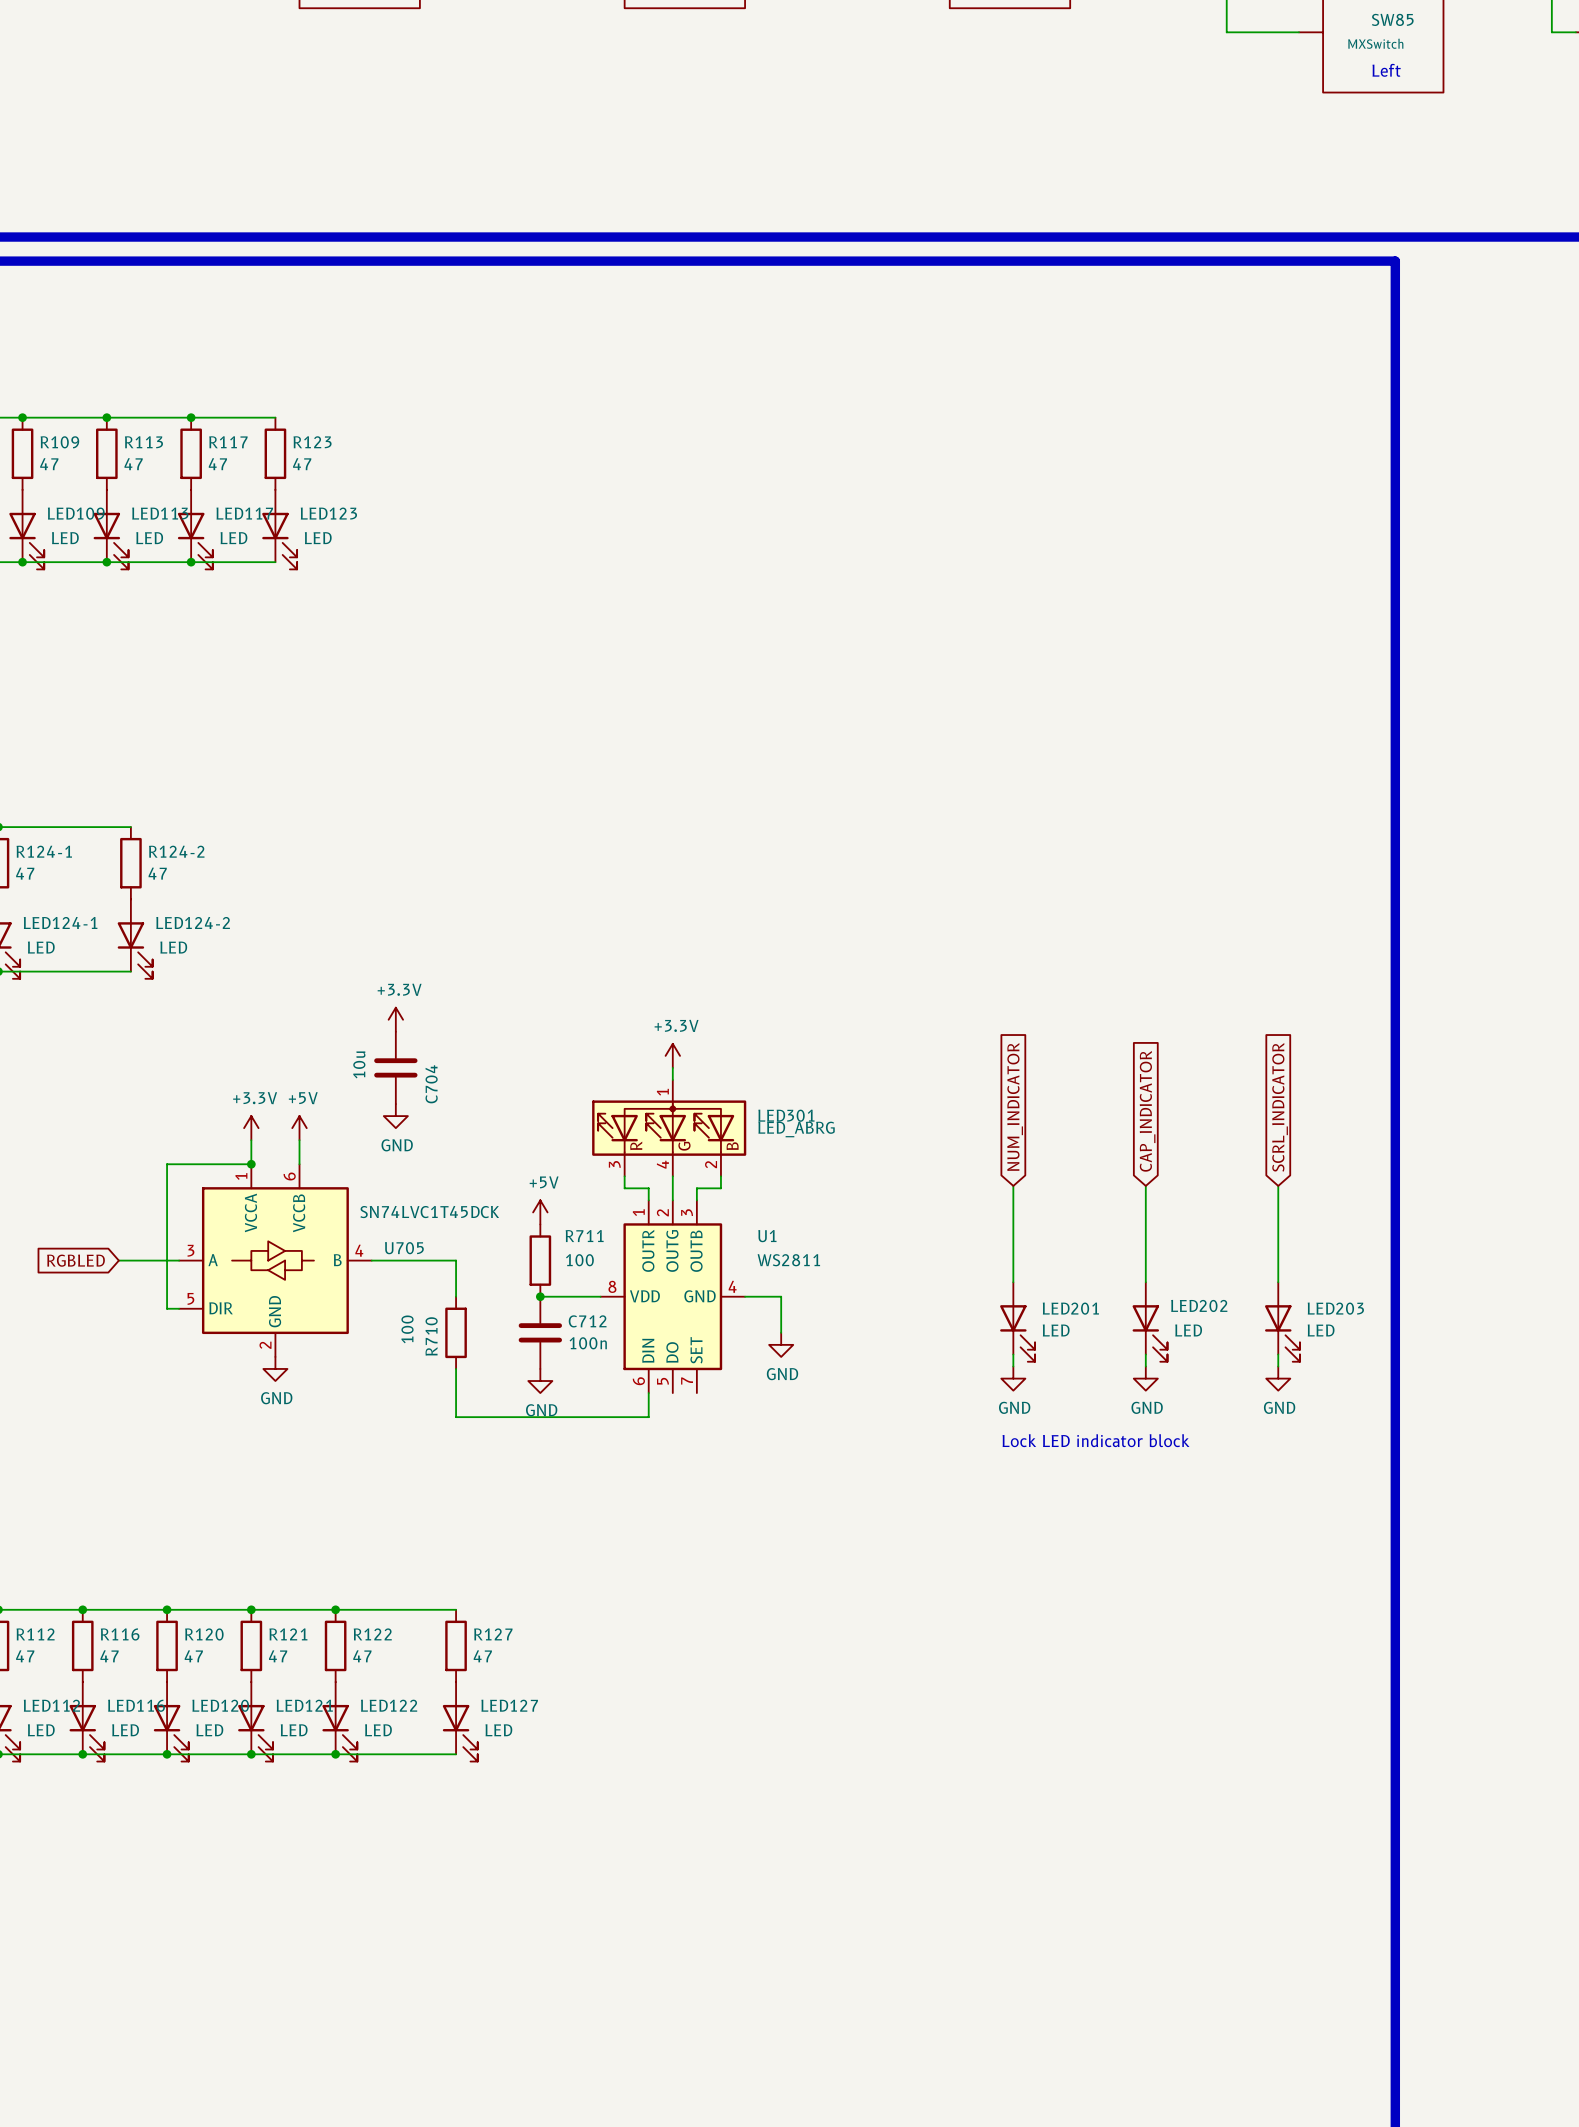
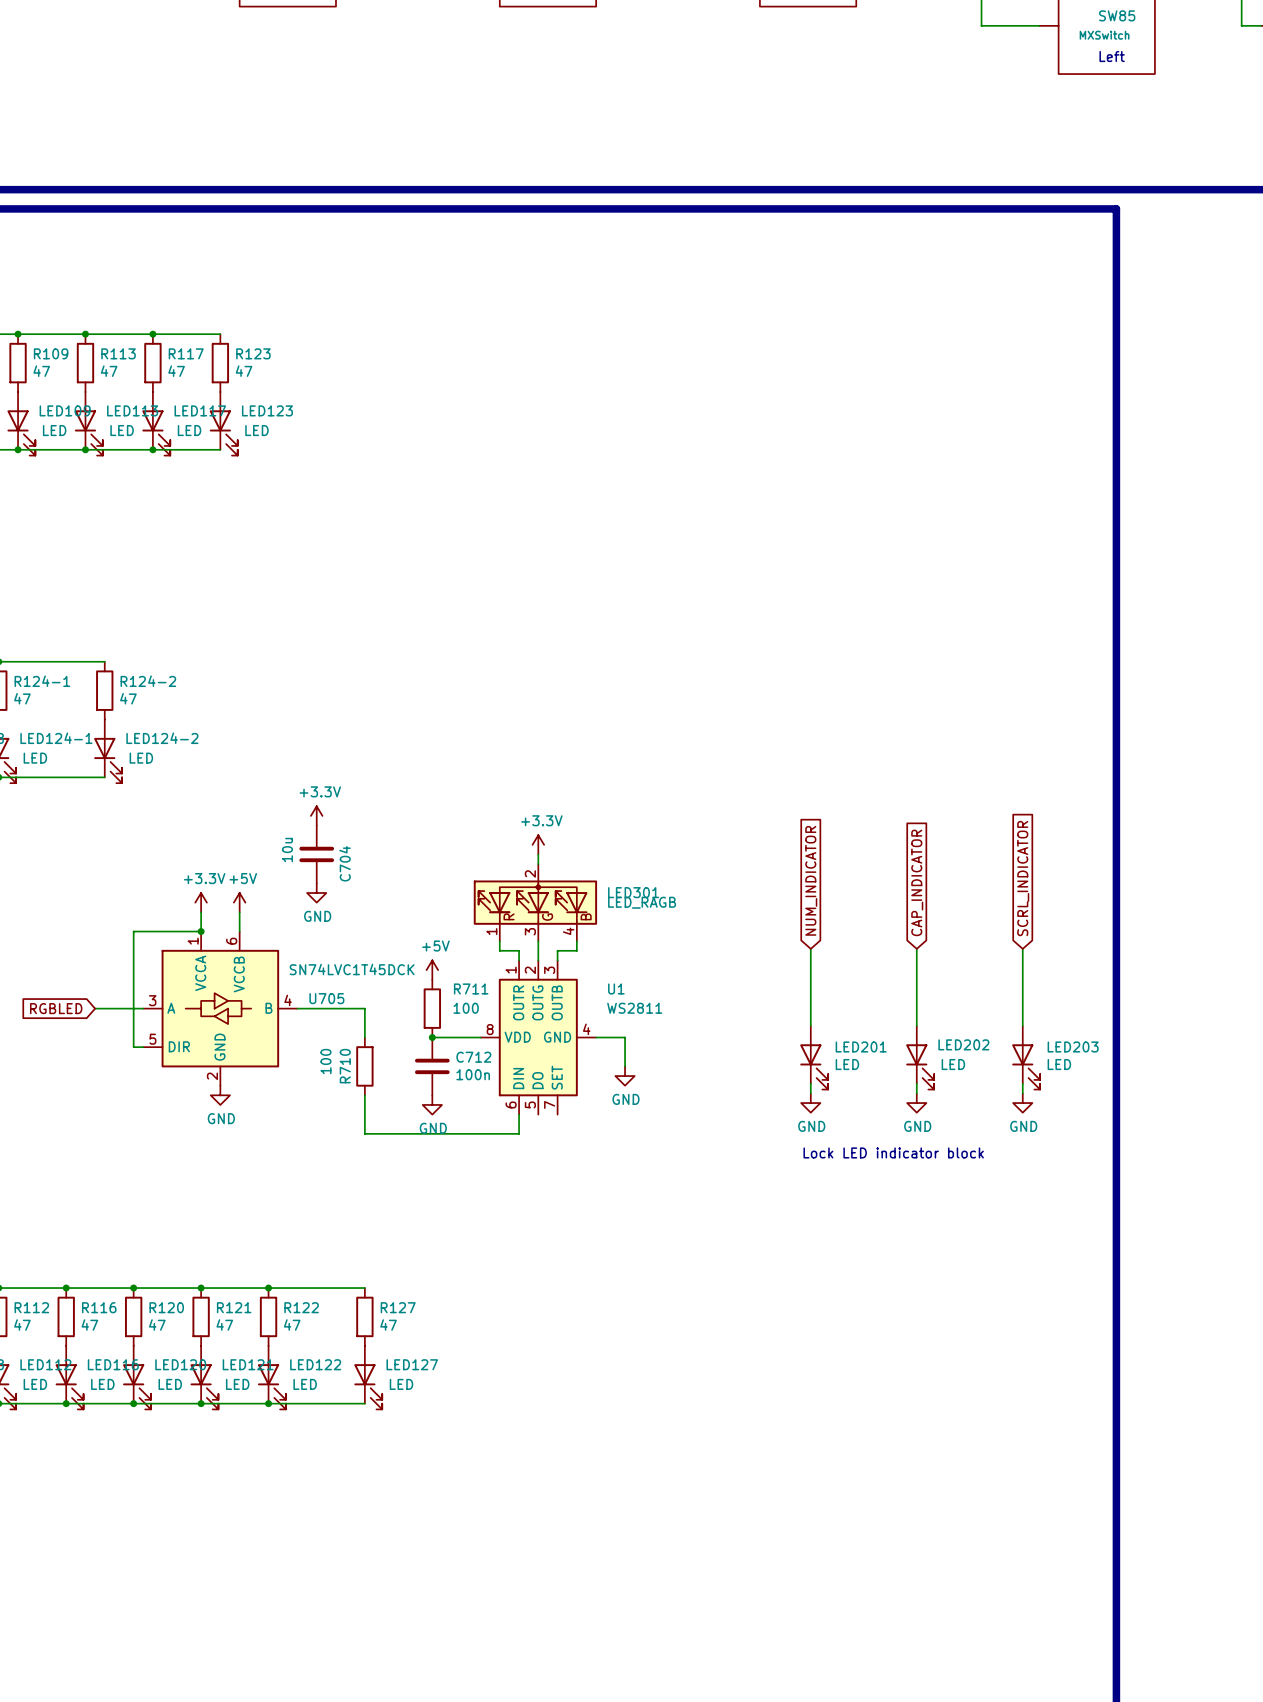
LED301 symbol: [592, 1079, 747, 1177] -> [473, 864, 598, 942]
LED301 value: LED_ABRG (796, 1129) -> LED_RAGB (642, 902)

